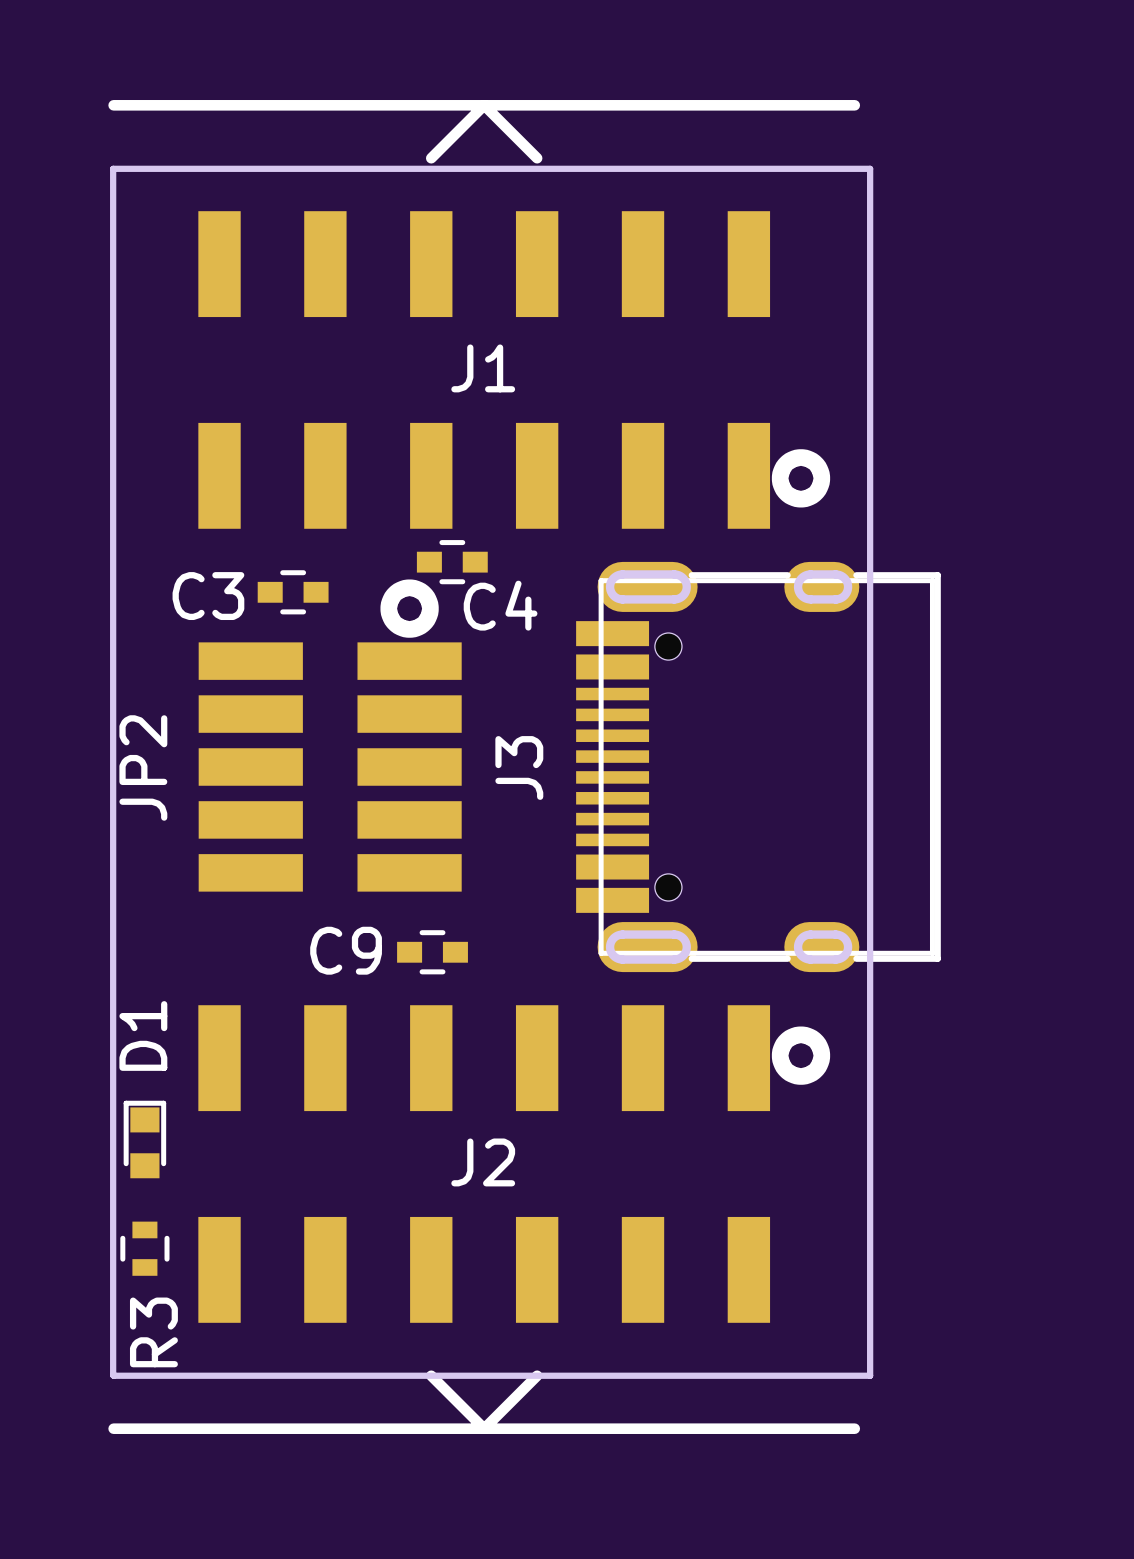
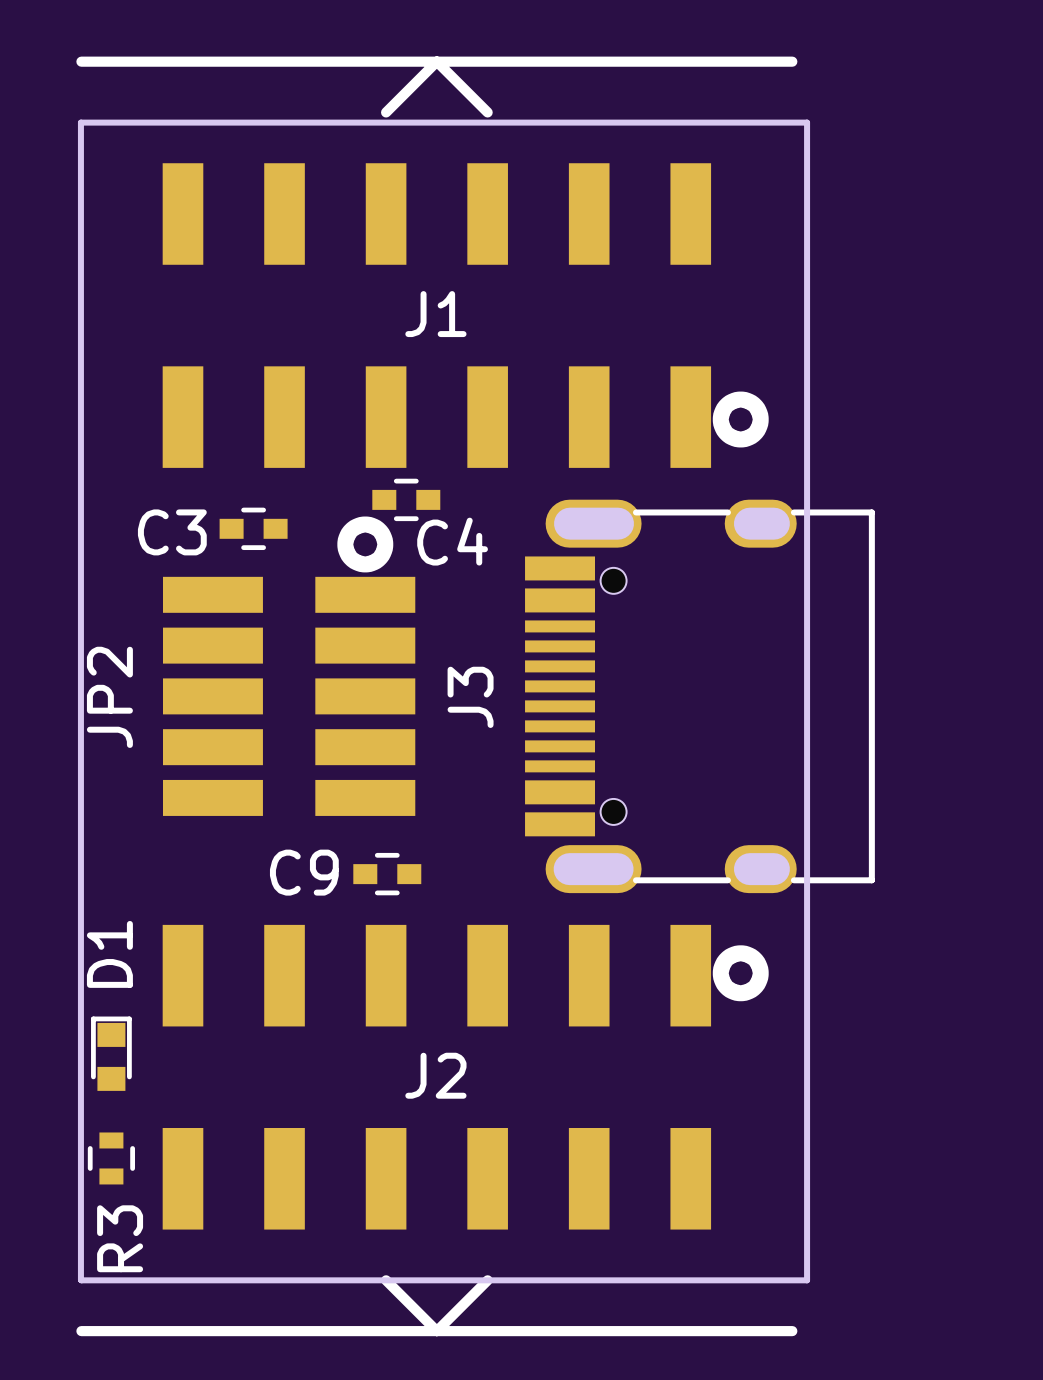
J3 footprint: [576, 561, 941, 973] -> [525, 499, 875, 894]

